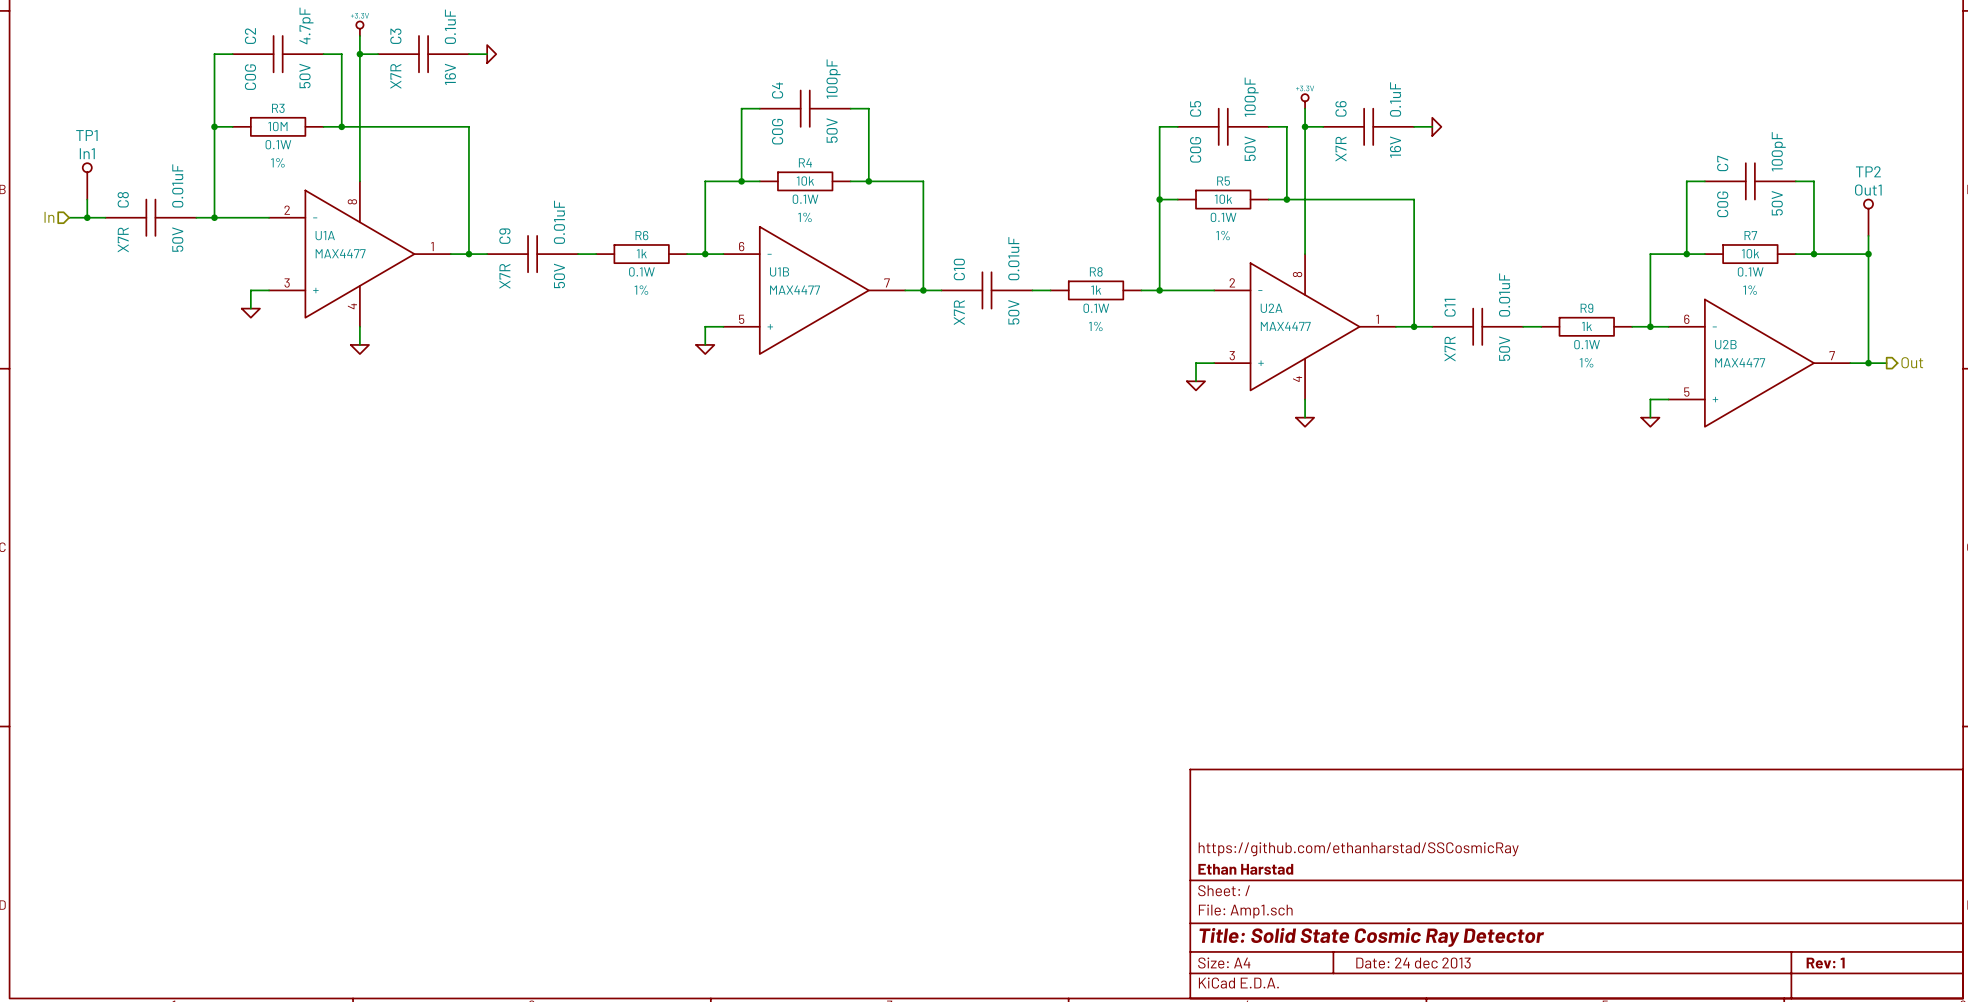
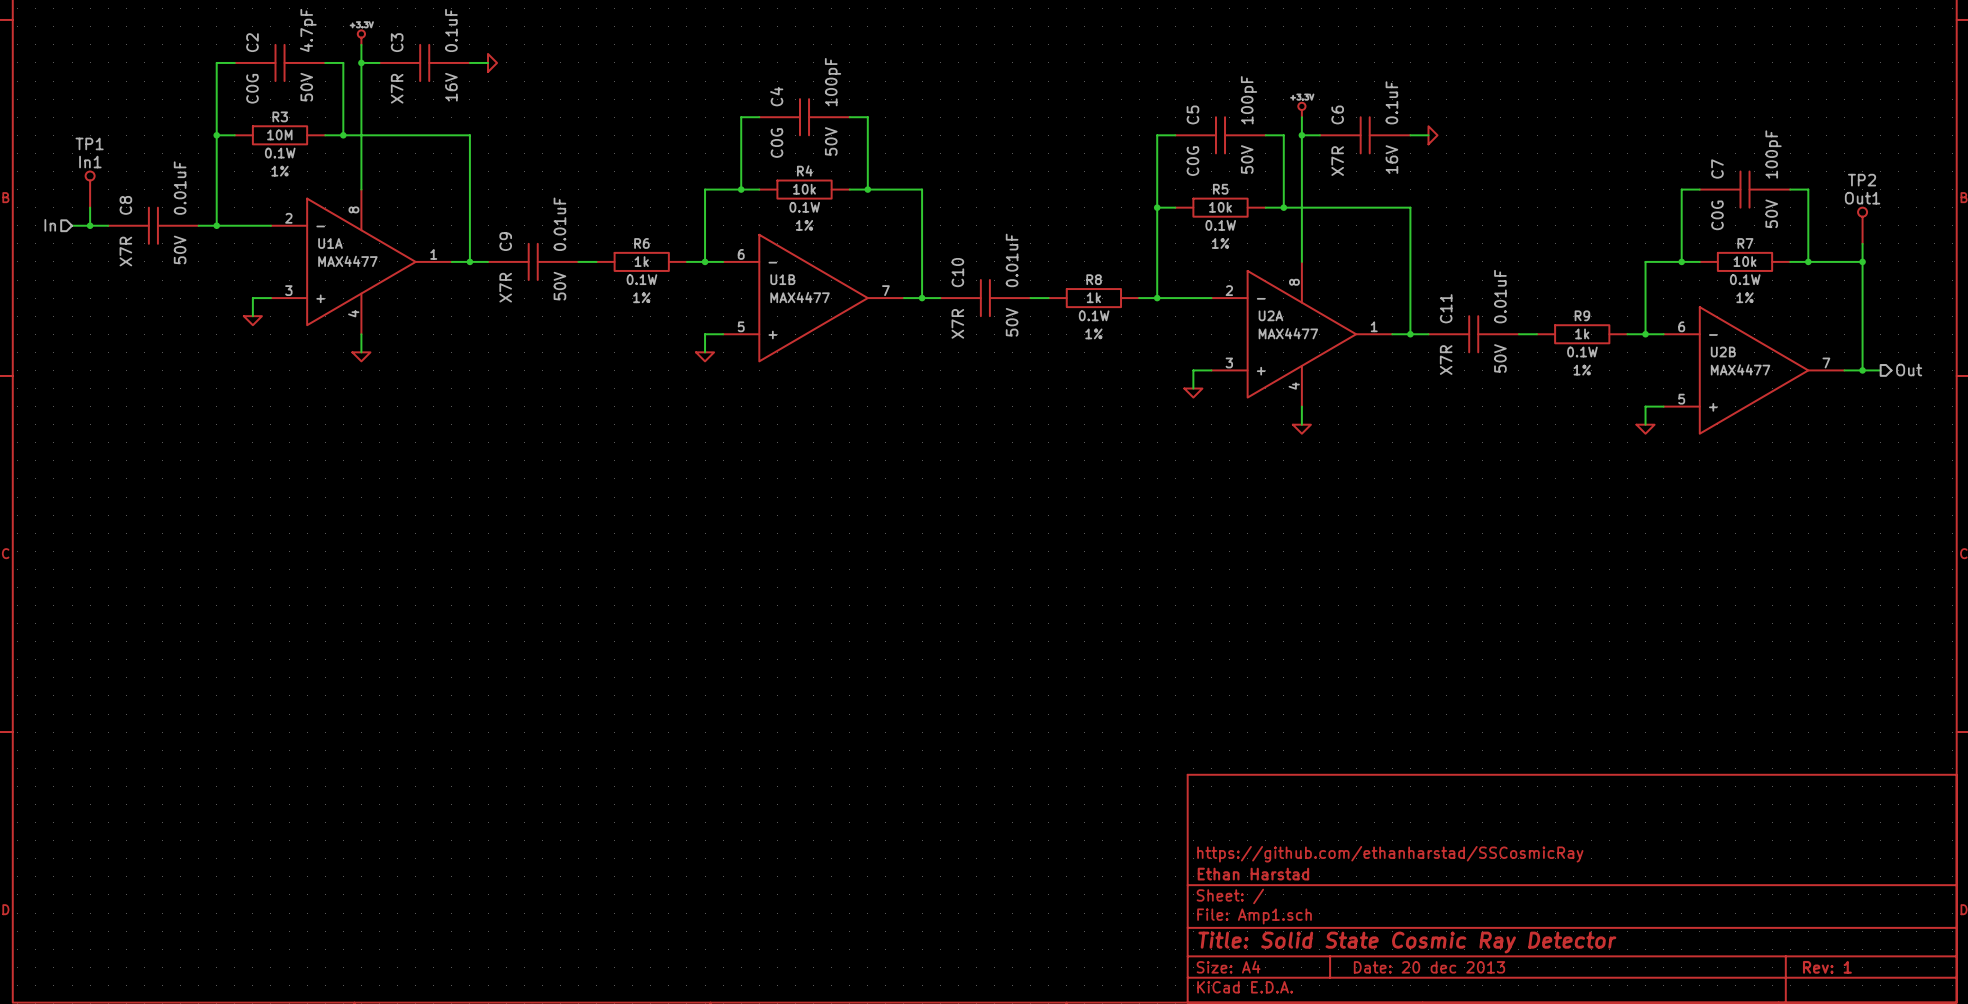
title block: Date: 24 dec 2013 (1413, 963) -> Date: 20 dec 2013 (1429, 967)

